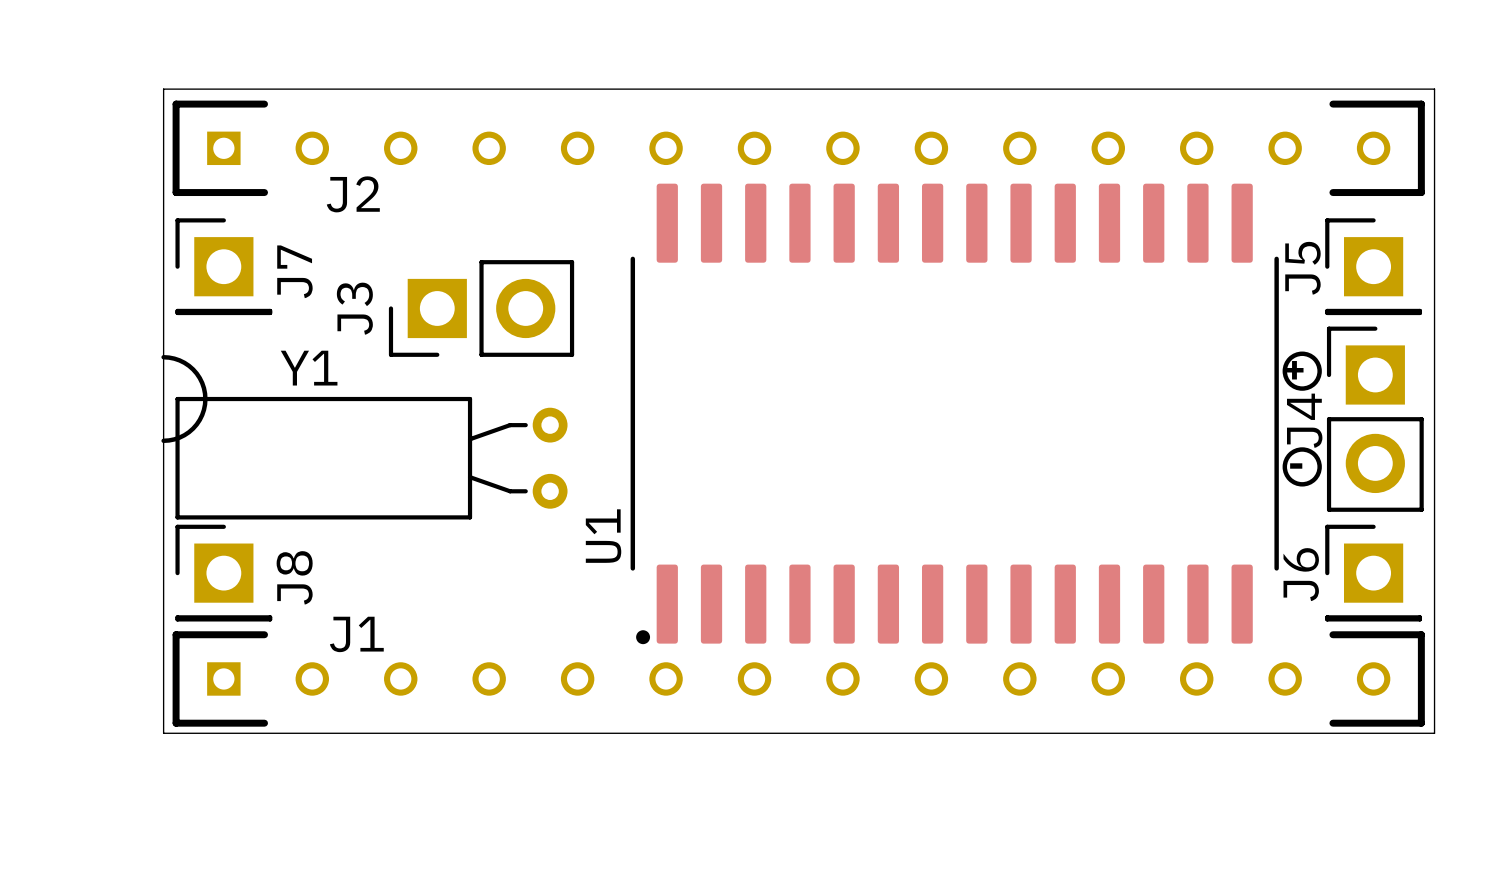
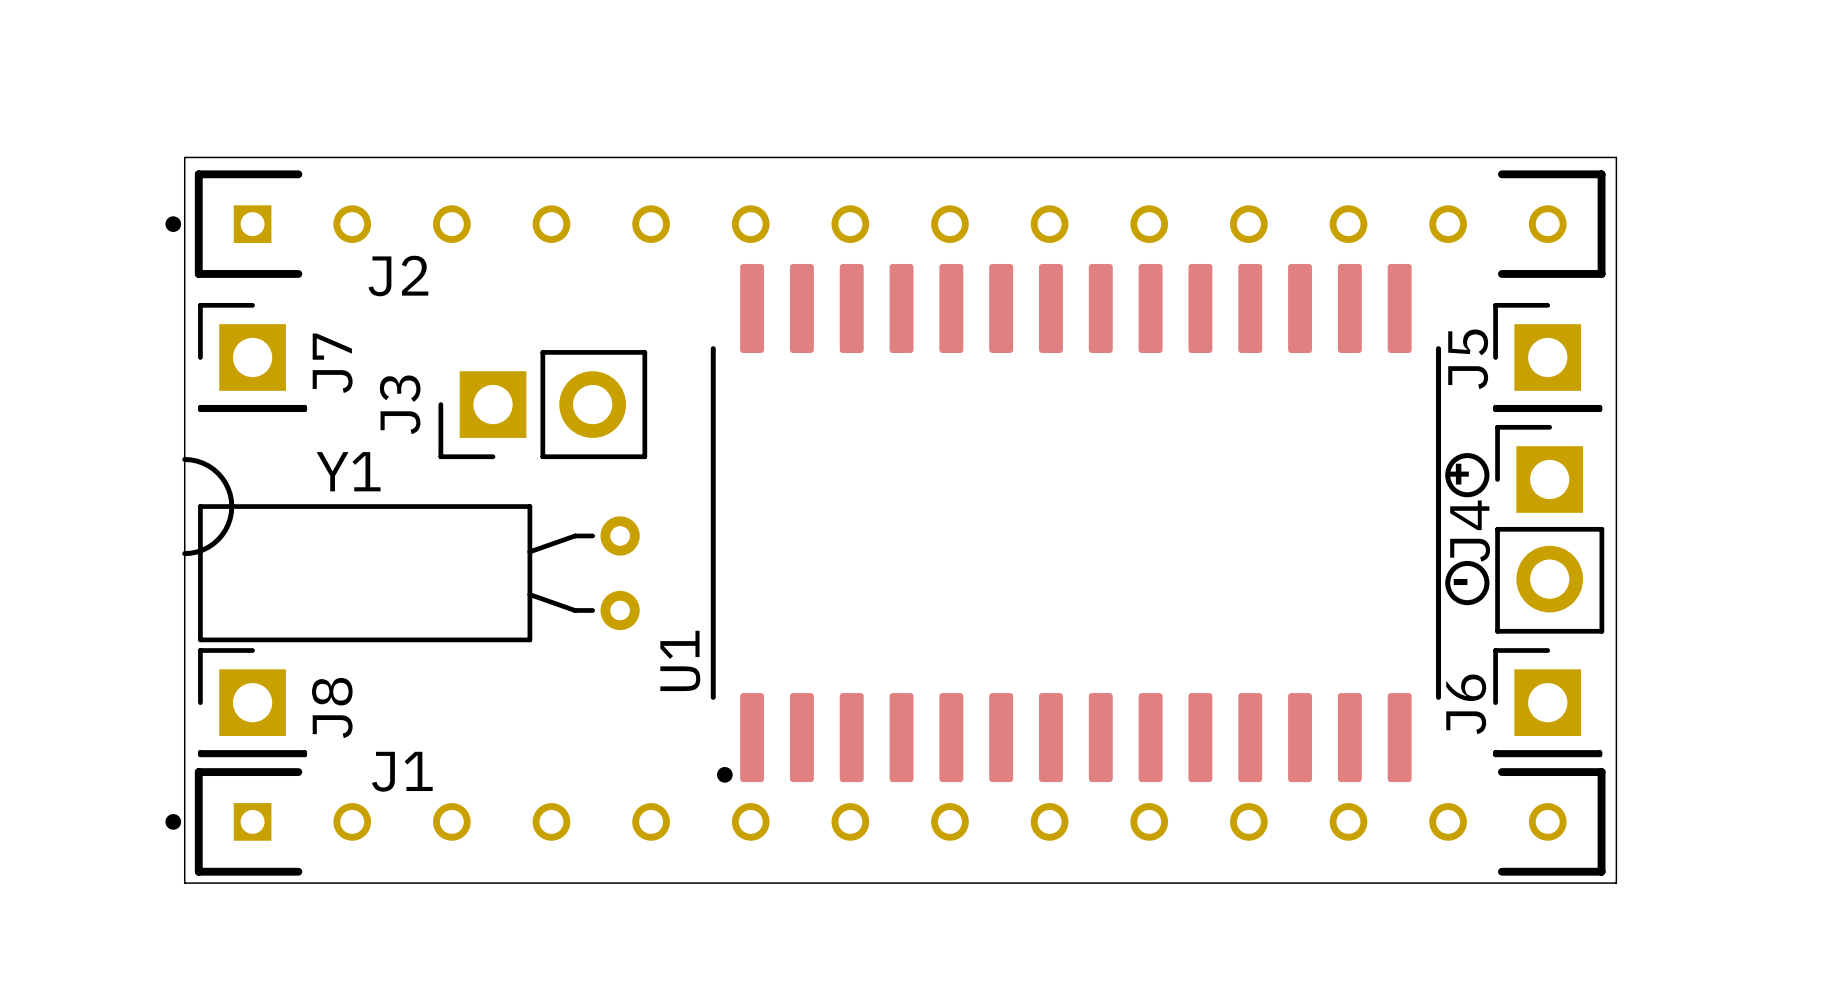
J2 footprint: [172, 100, 1425, 197] -> [165, 170, 1606, 278]
J1 footprint: [172, 631, 1425, 727] -> [165, 768, 1606, 876]

